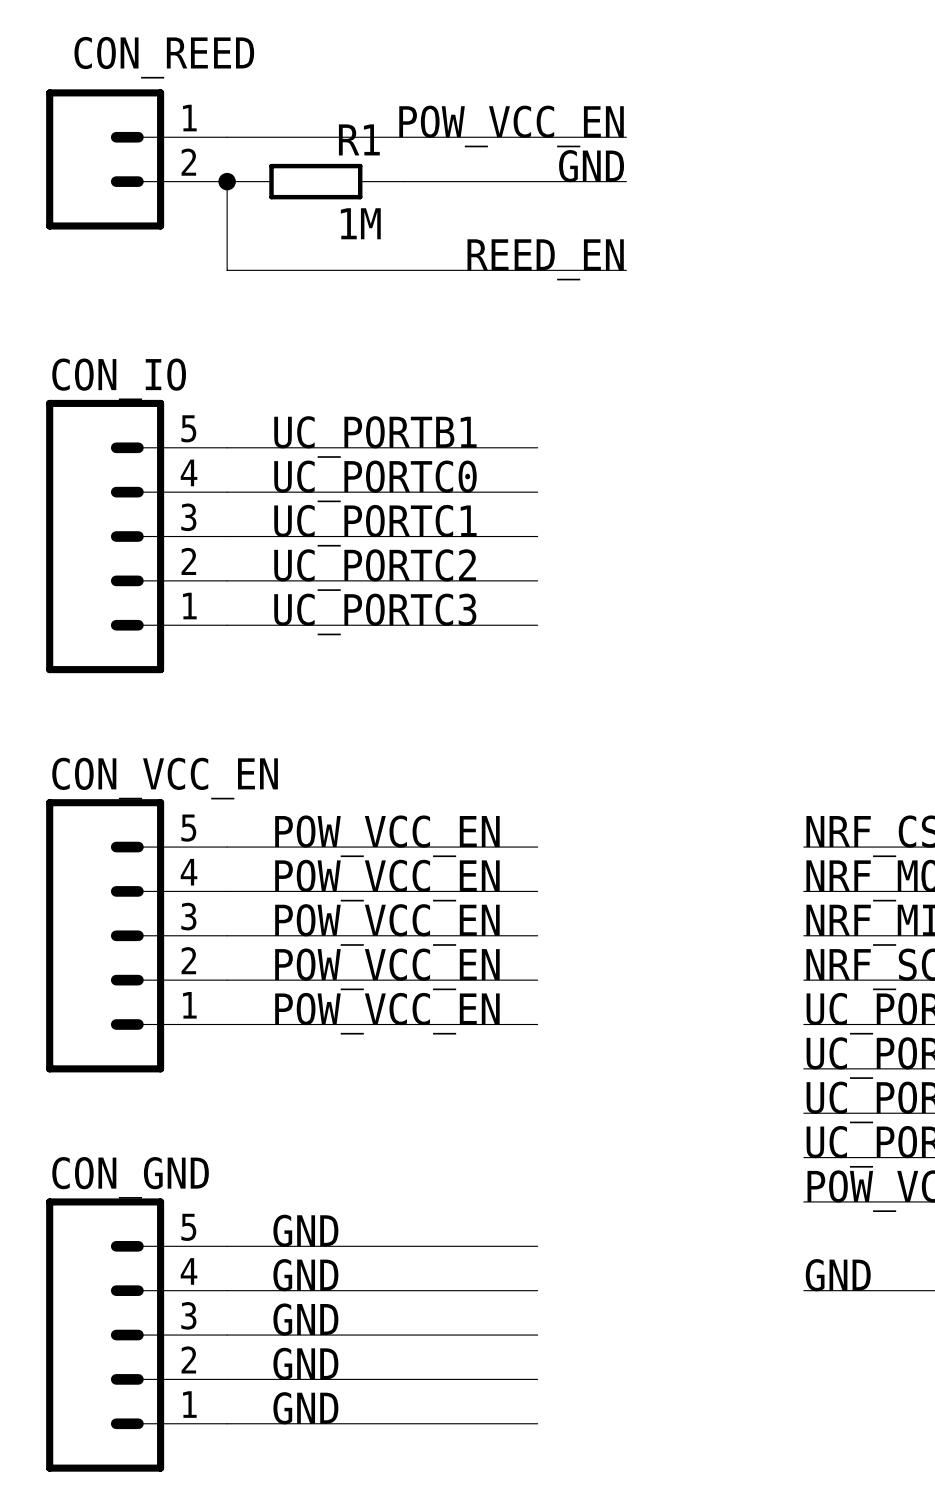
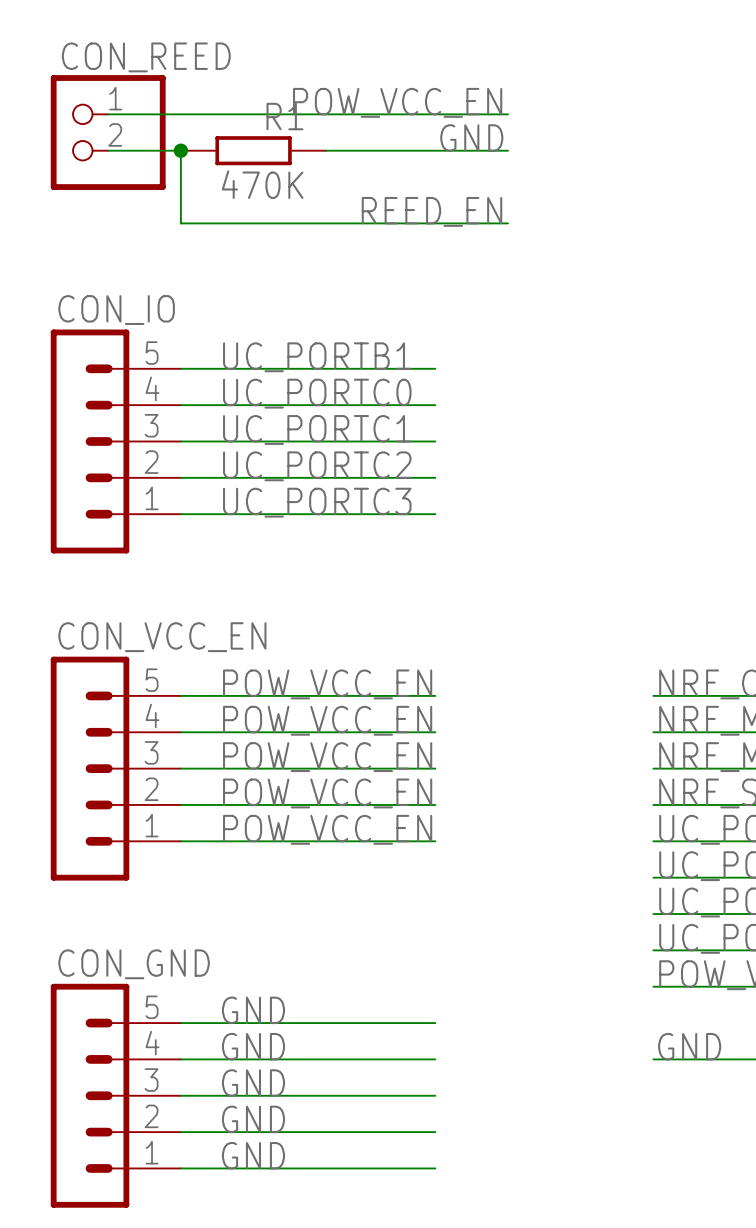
CON_REED symbol: [46, 89, 228, 230] -> [50, 75, 166, 190]
R1 value: 1M (360, 223) -> 470K (262, 184)
CON_IO symbol: [46, 399, 228, 674] -> [50, 329, 181, 554]
CON_VCC_EN symbol: [46, 799, 228, 1073] -> [50, 656, 181, 881]
CON_GND symbol: [46, 1198, 228, 1472] -> [50, 983, 181, 1208]

